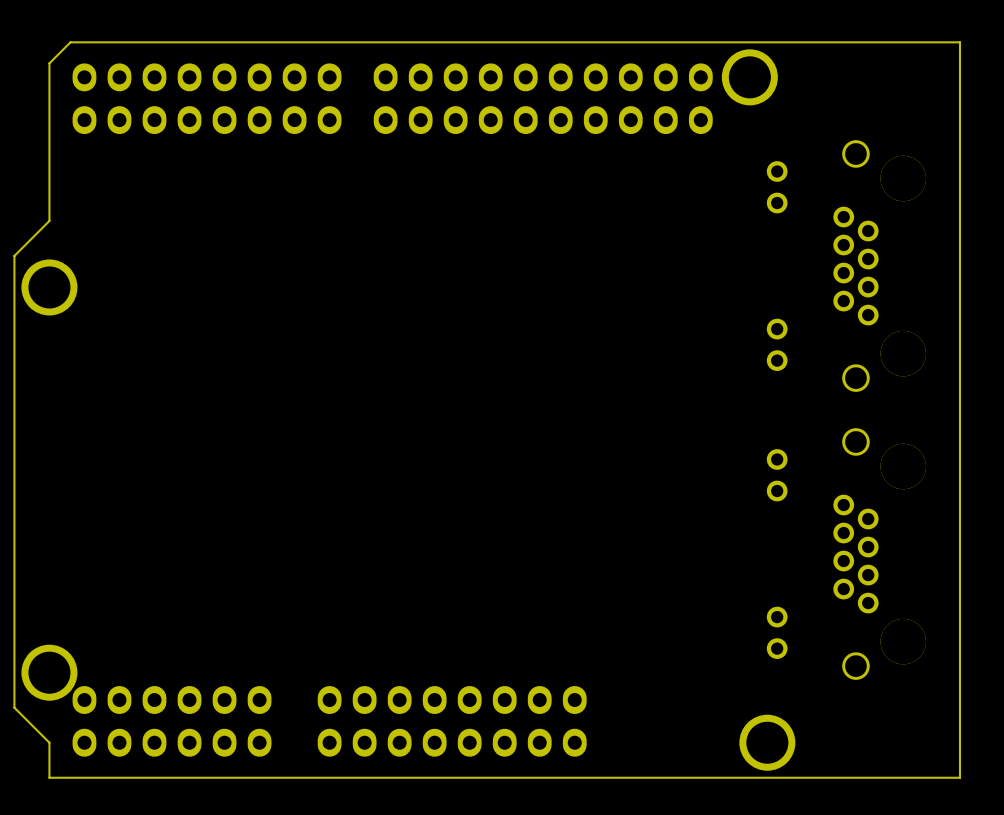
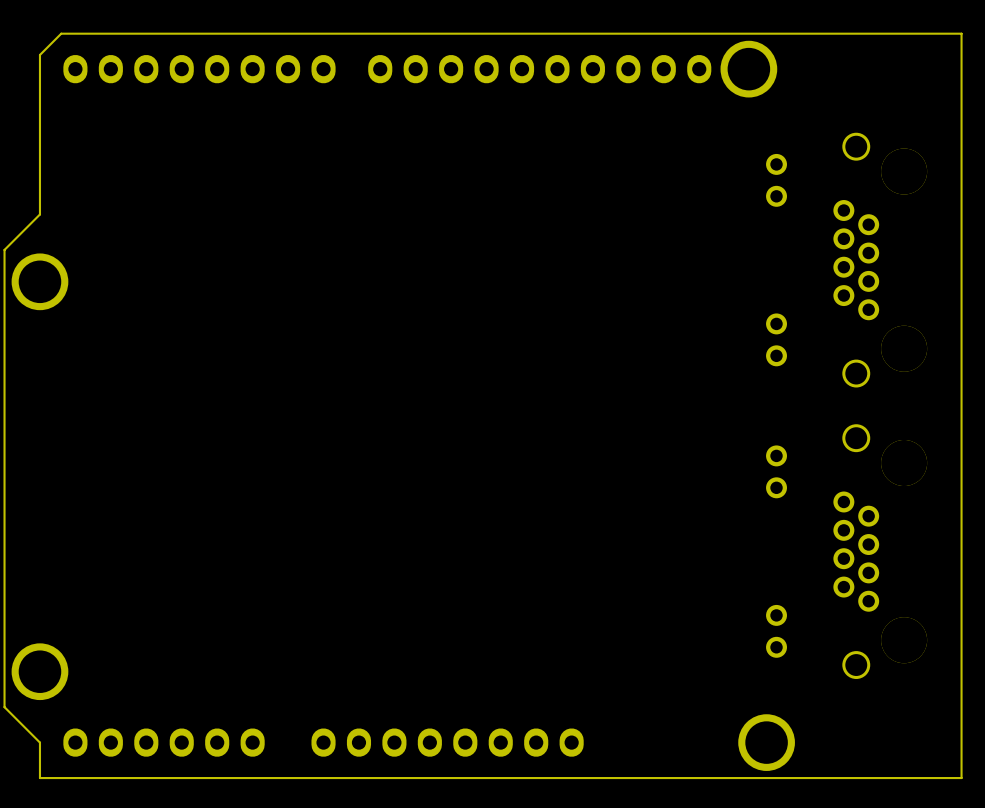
part: (207, 120) -> none
part: (543, 120) -> none
part: (172, 700) -> none
part: (452, 700) -> none

